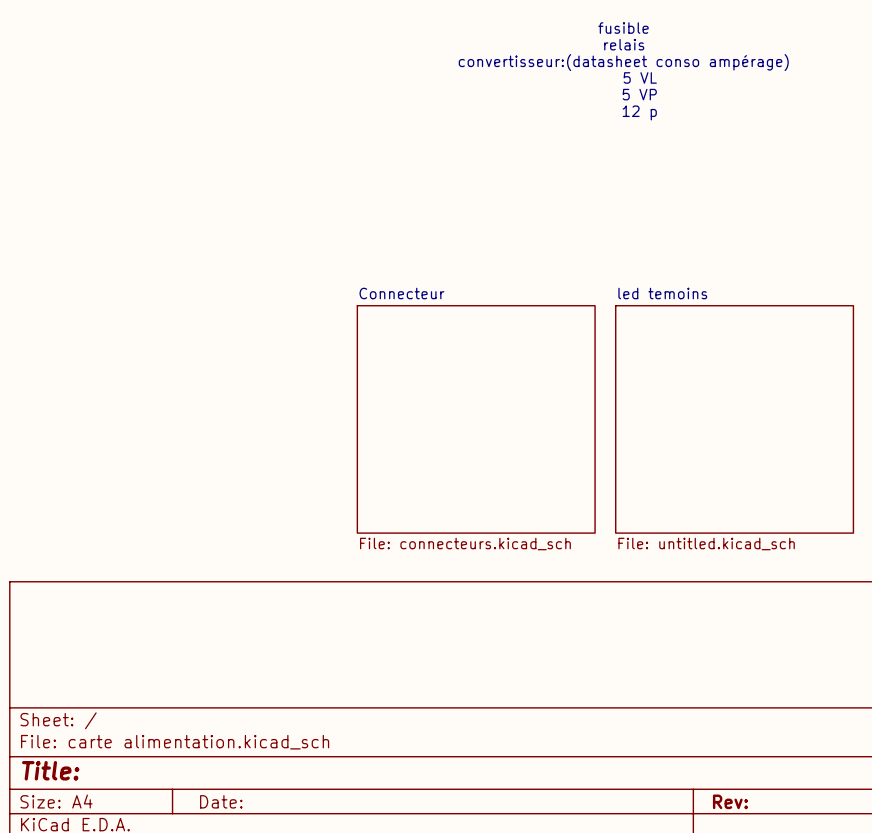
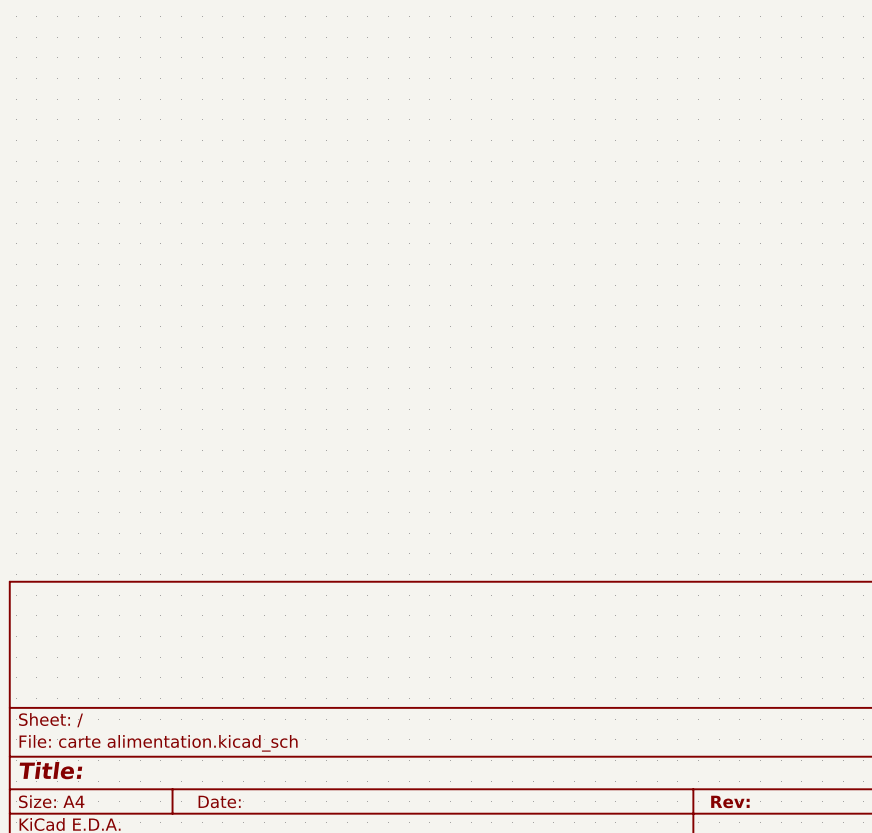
text: fusible (623, 28) -> none
text: relais (624, 44) -> none
text: convertisseur:(datasheet conso ampérage) (623, 62) -> none
text: 5 VL (640, 77) -> none
text: 5 VP (639, 94) -> none
text: 12 p (639, 112) -> none
sheet Connecteur: File: connecteurs.kicad_sch (476, 419) -> none
sheet led temoins: File: untitled.kicad_sch (734, 419) -> none

